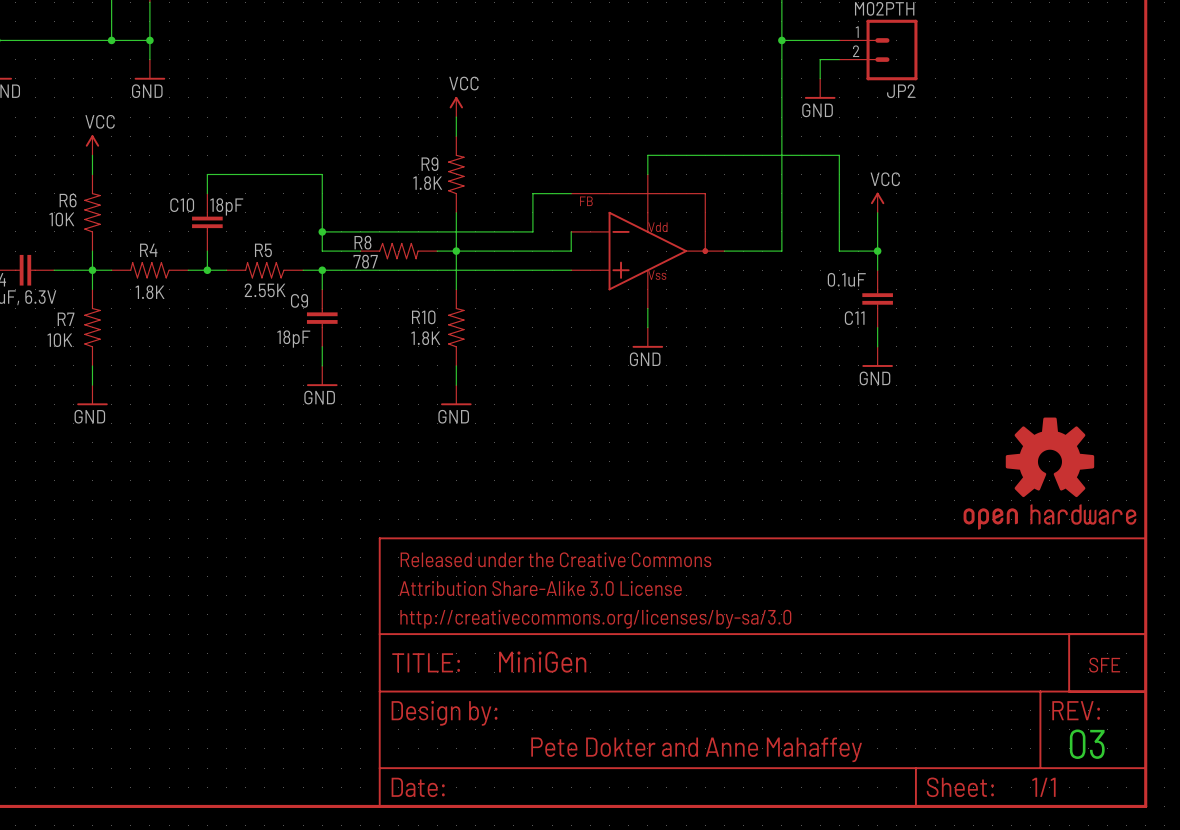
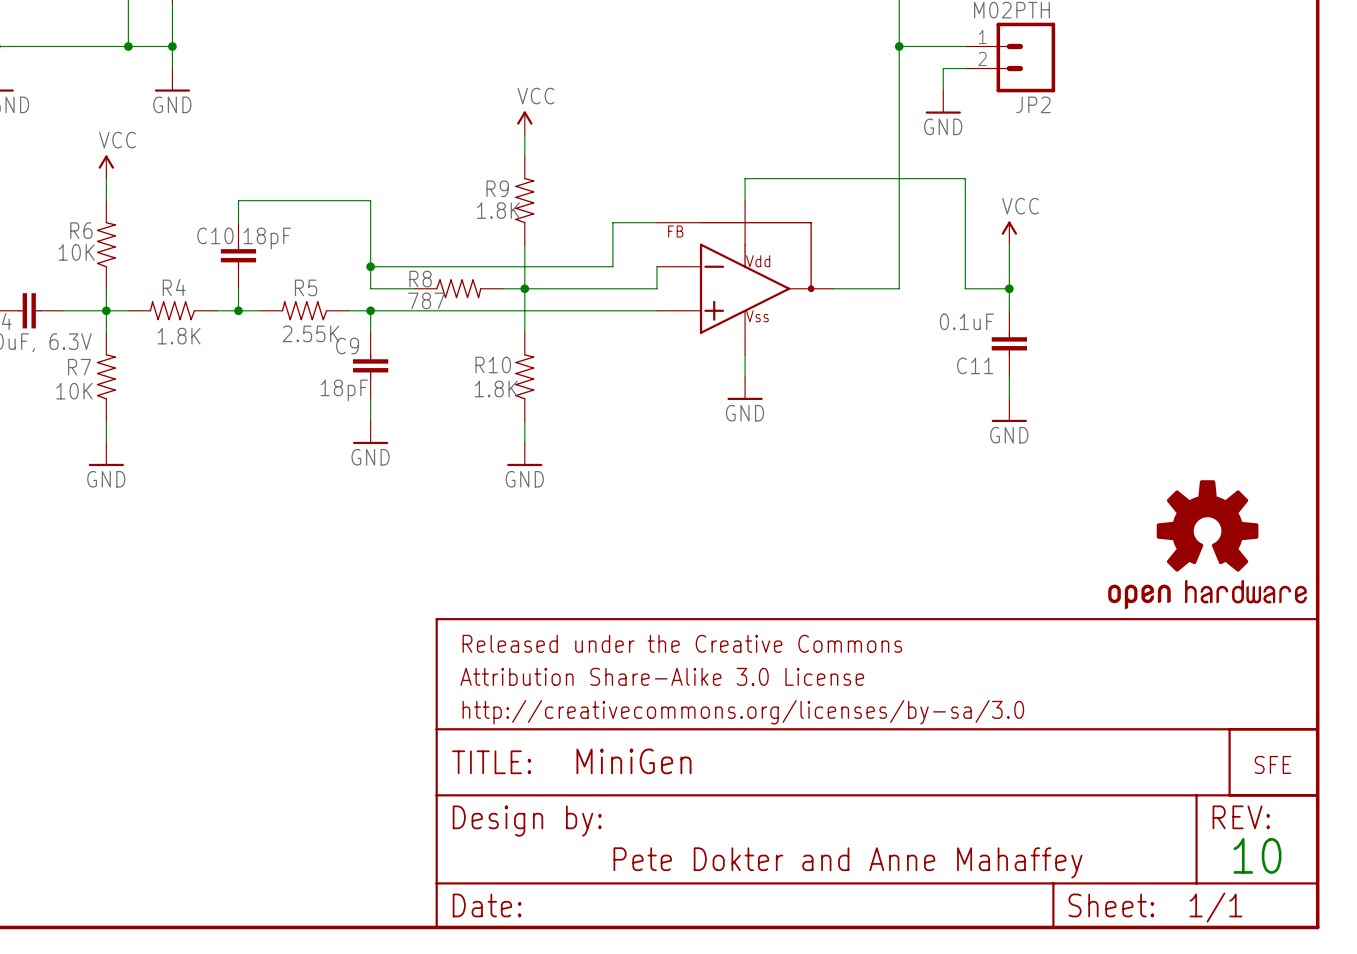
text: 03 (1087, 744) -> 10 (1257, 855)

